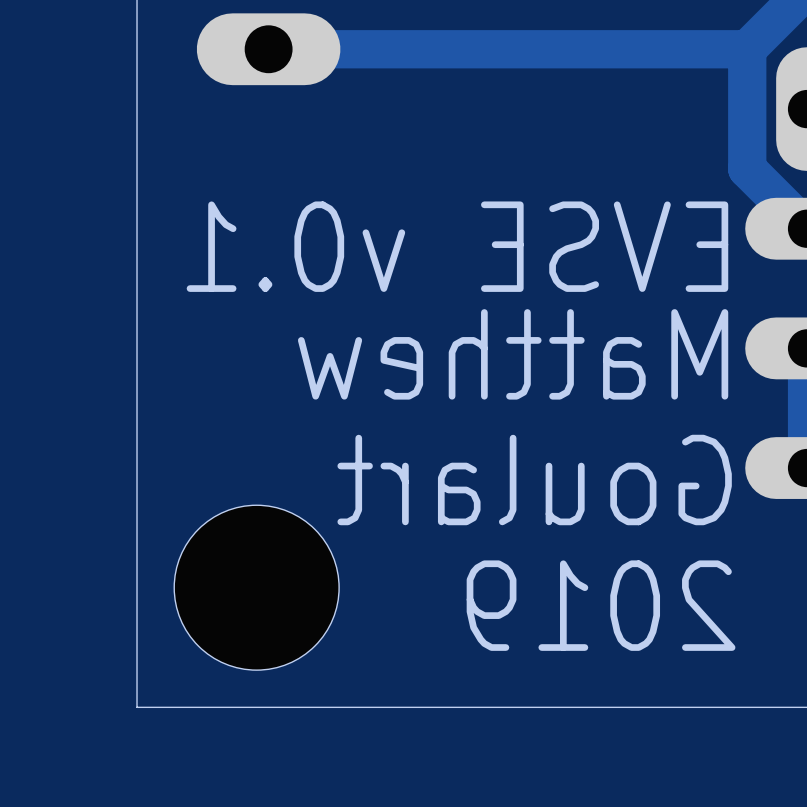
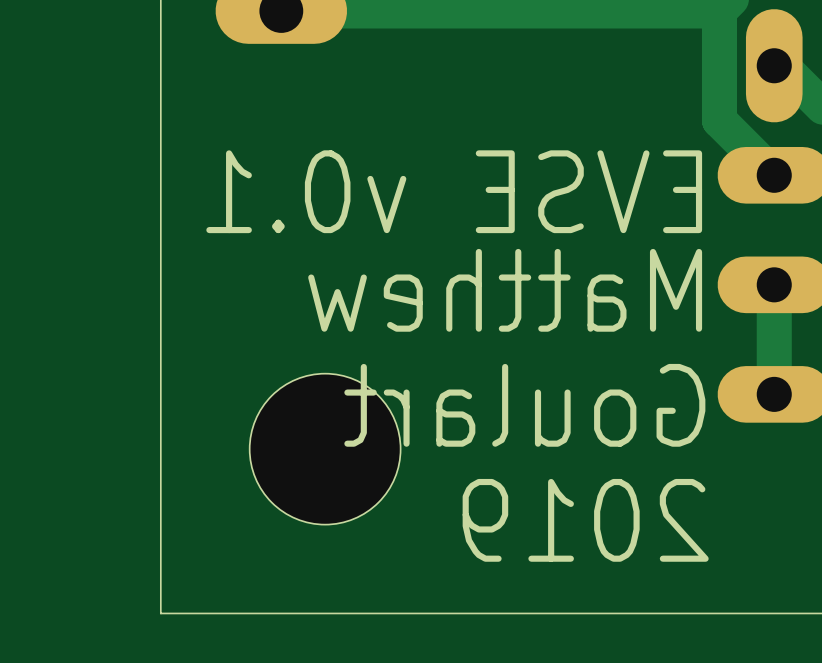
hole position: (256, 587) -> (325, 449)

